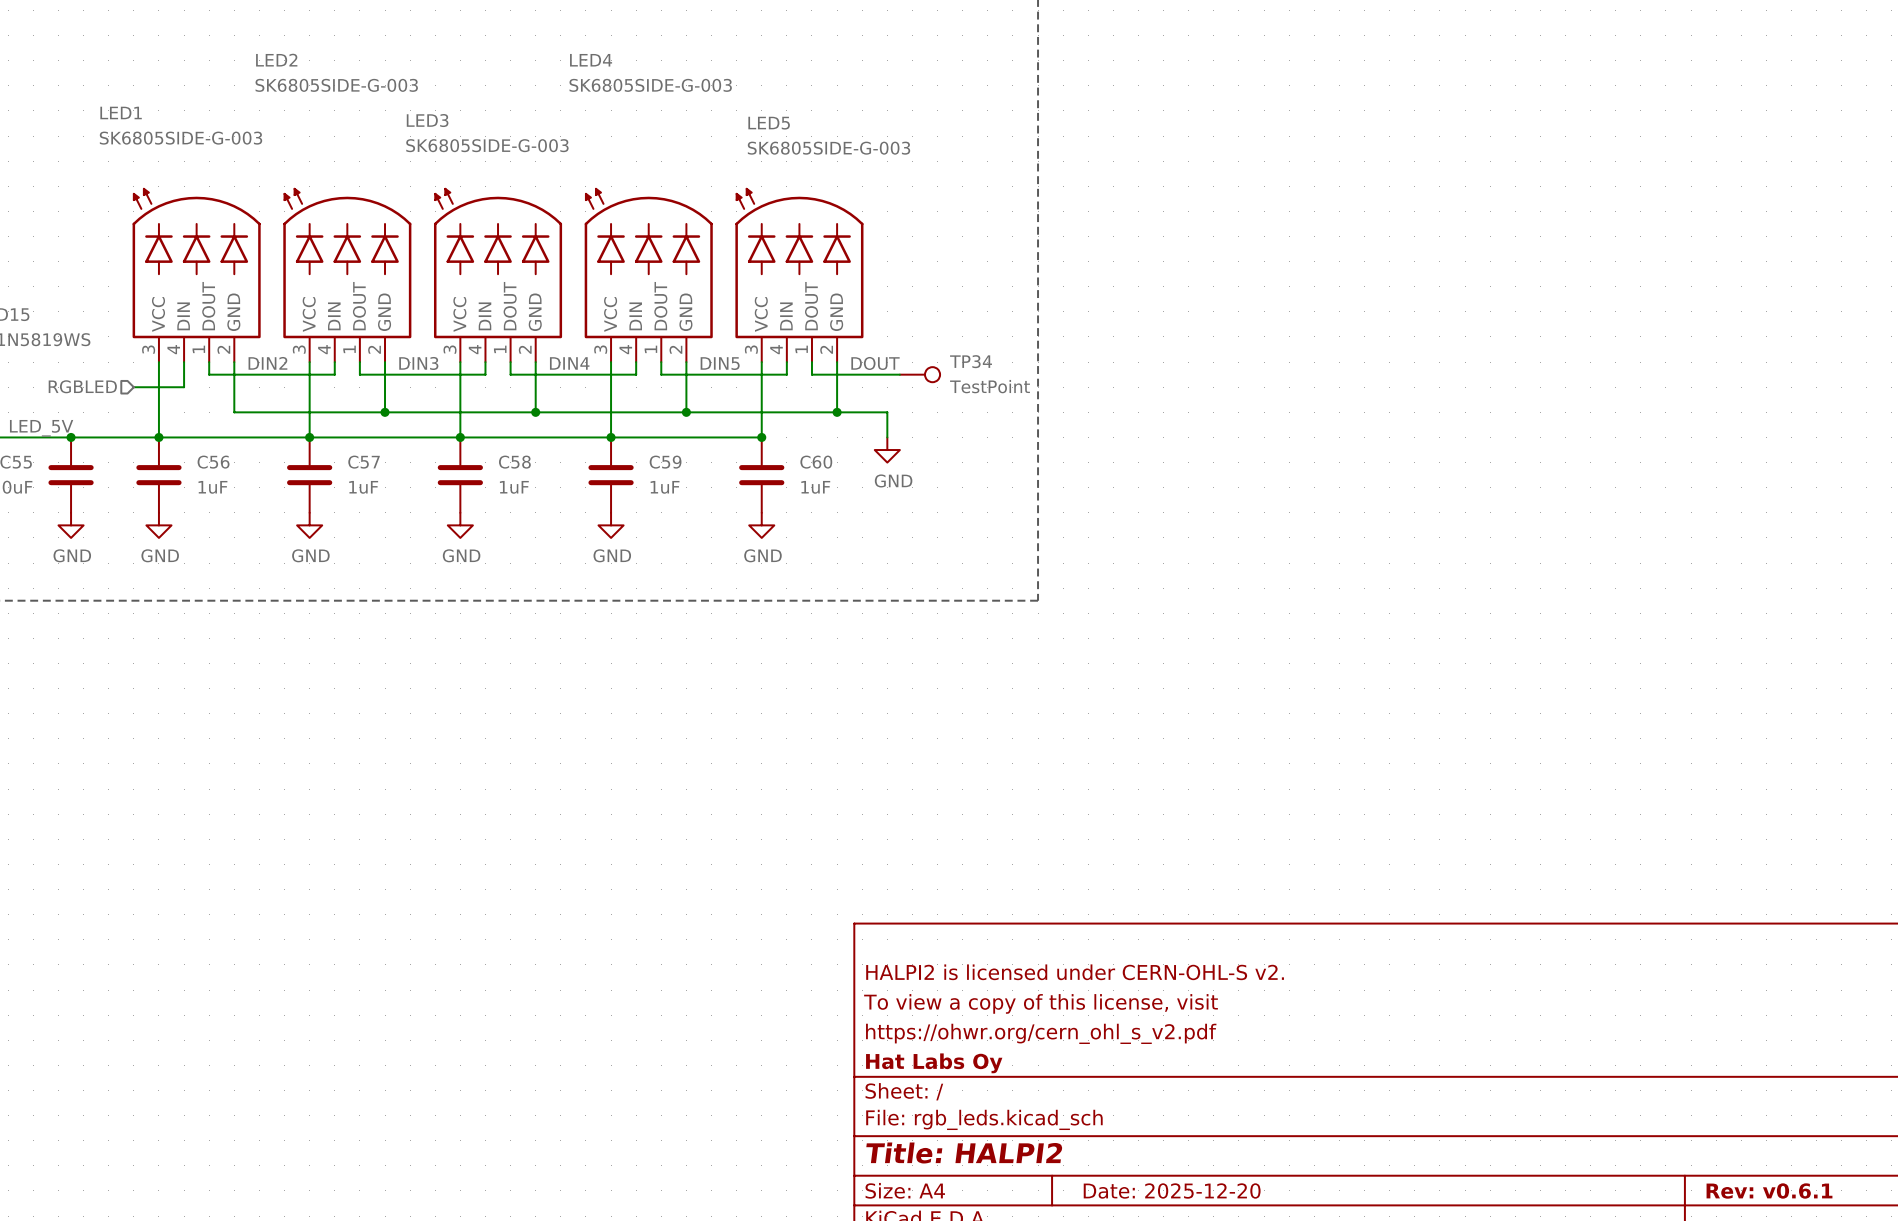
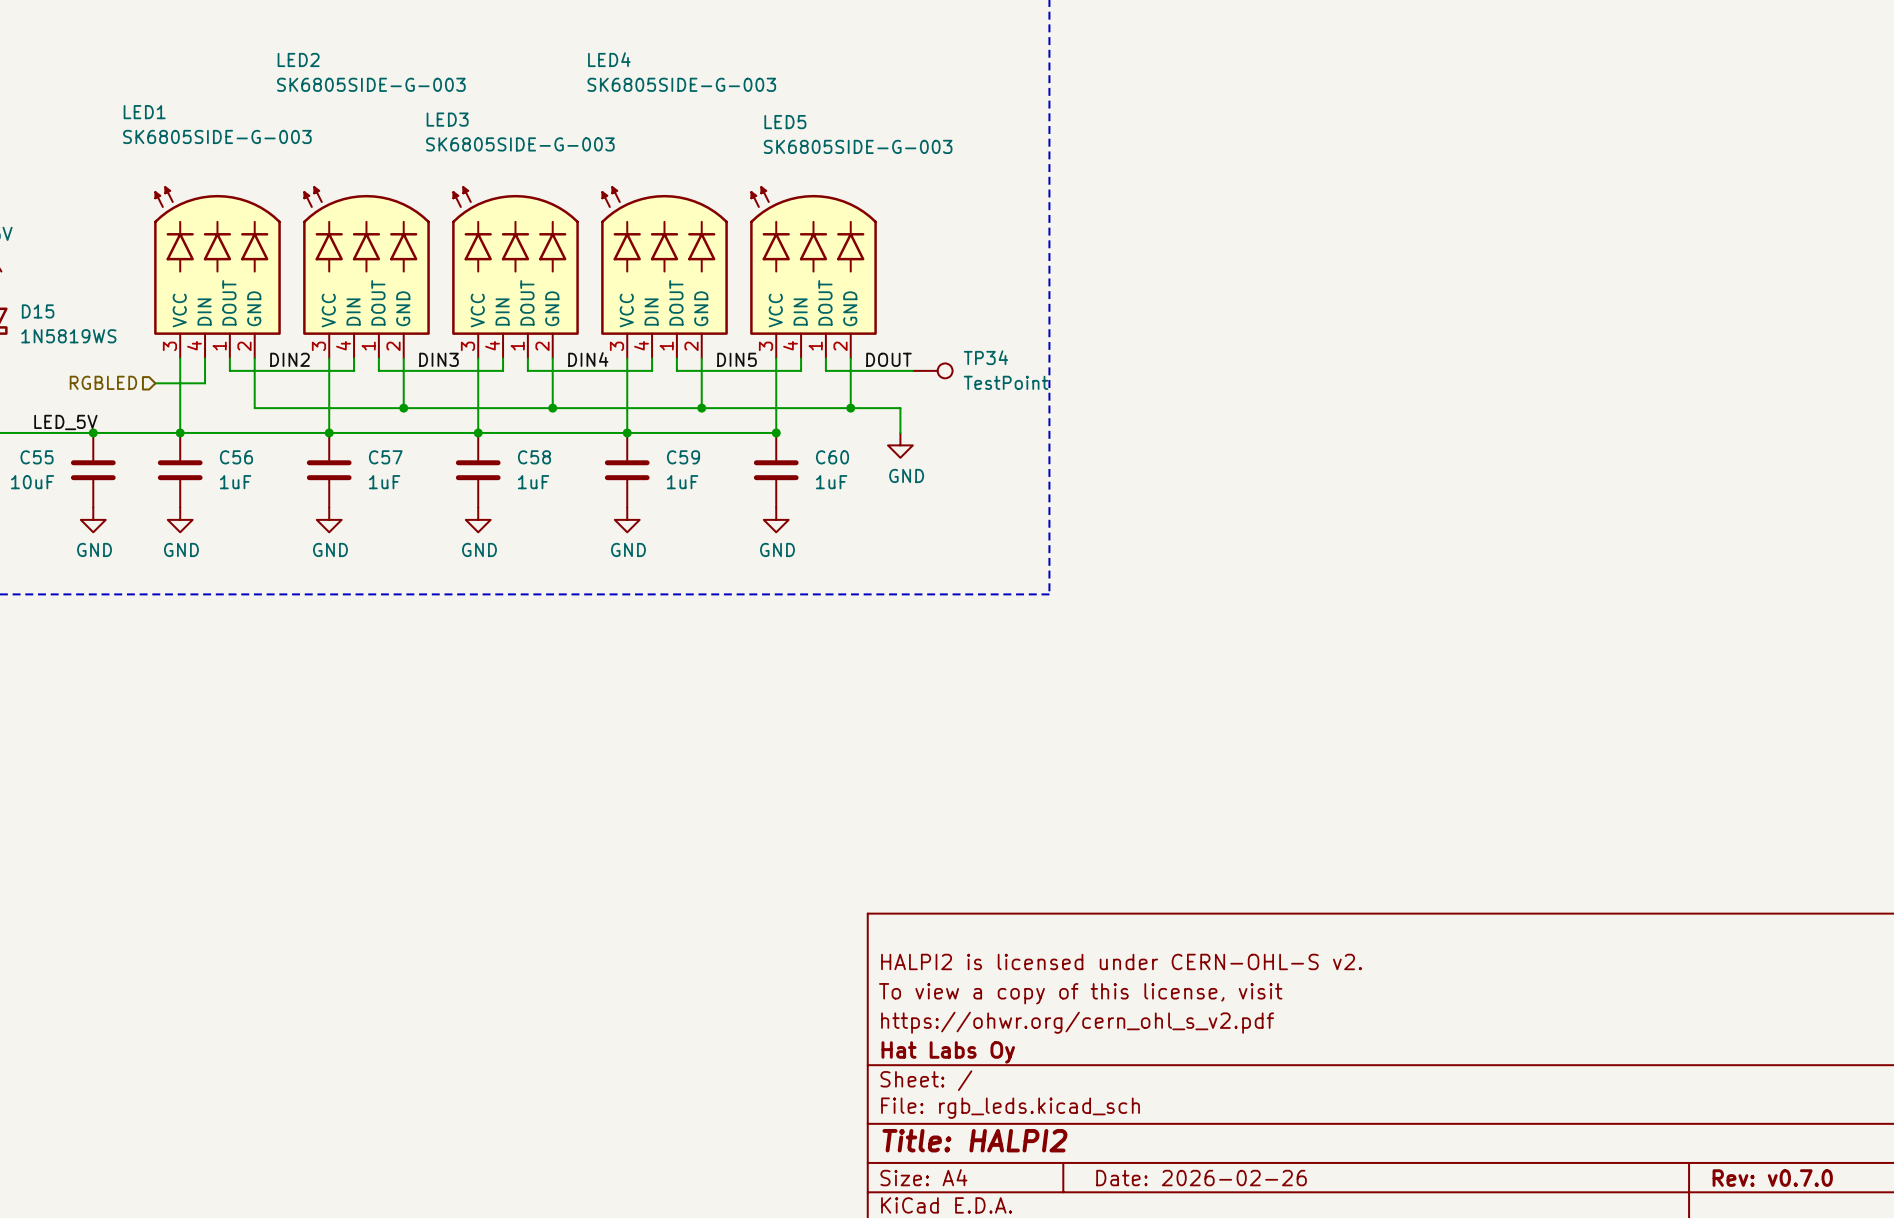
title block: Date: 2025-12-20 (1172, 1190) -> Date: 2026-02-26 (1201, 1178)
title block: Rev: v0.6.1 (1769, 1190) -> Rev: v0.7.0 (1772, 1178)

